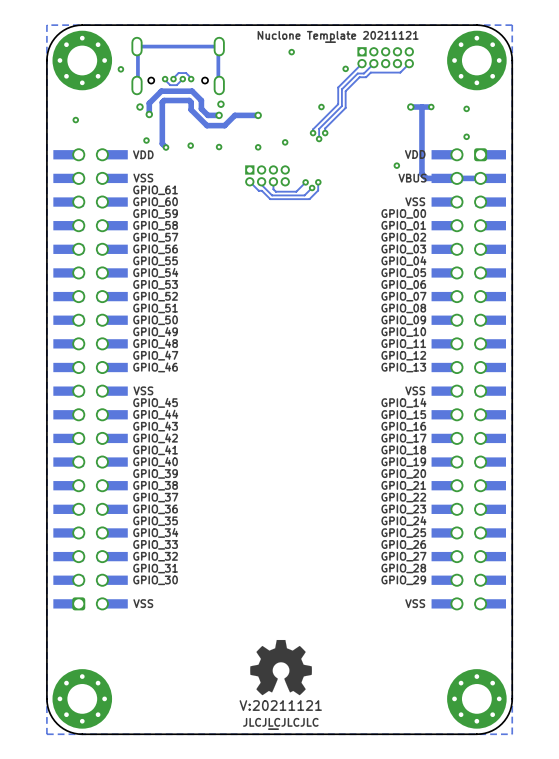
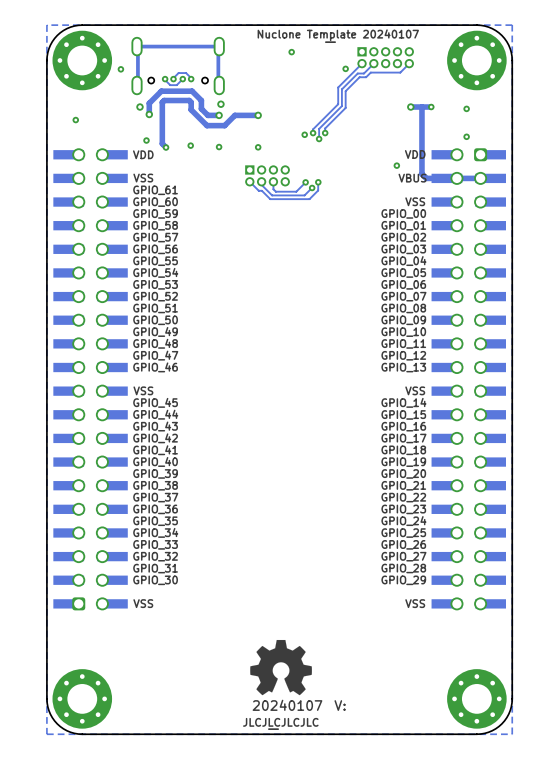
drawing shape: [257, 30, 419, 43] -> [257, 29, 419, 43]
via: (321, 107) -> none
via: none -> (304, 134)
via: (285, 142) -> none
drawing: none -> [252, 699, 346, 711]
drawing: [239, 700, 322, 711] -> none

